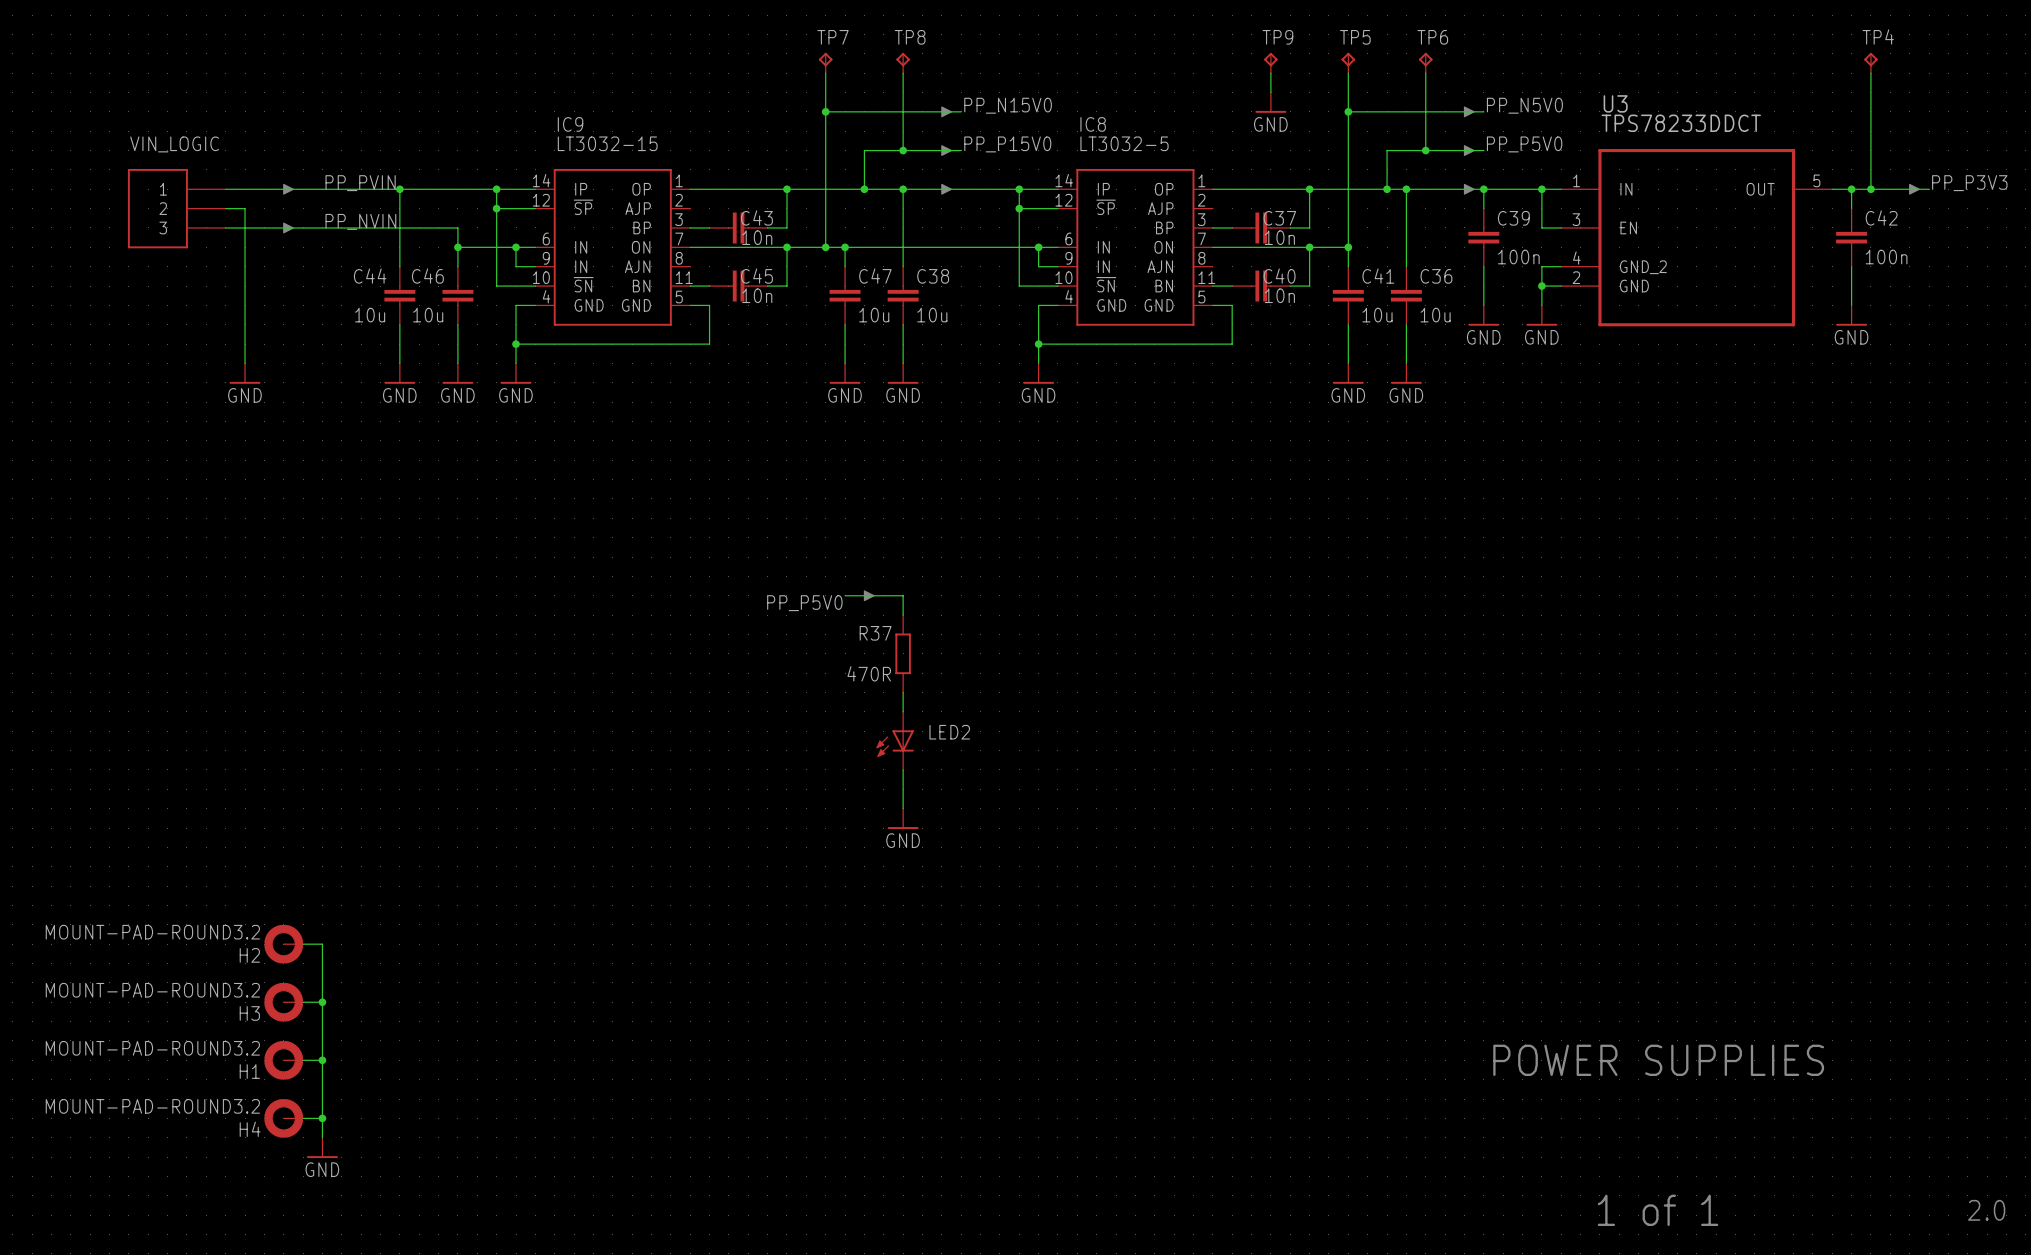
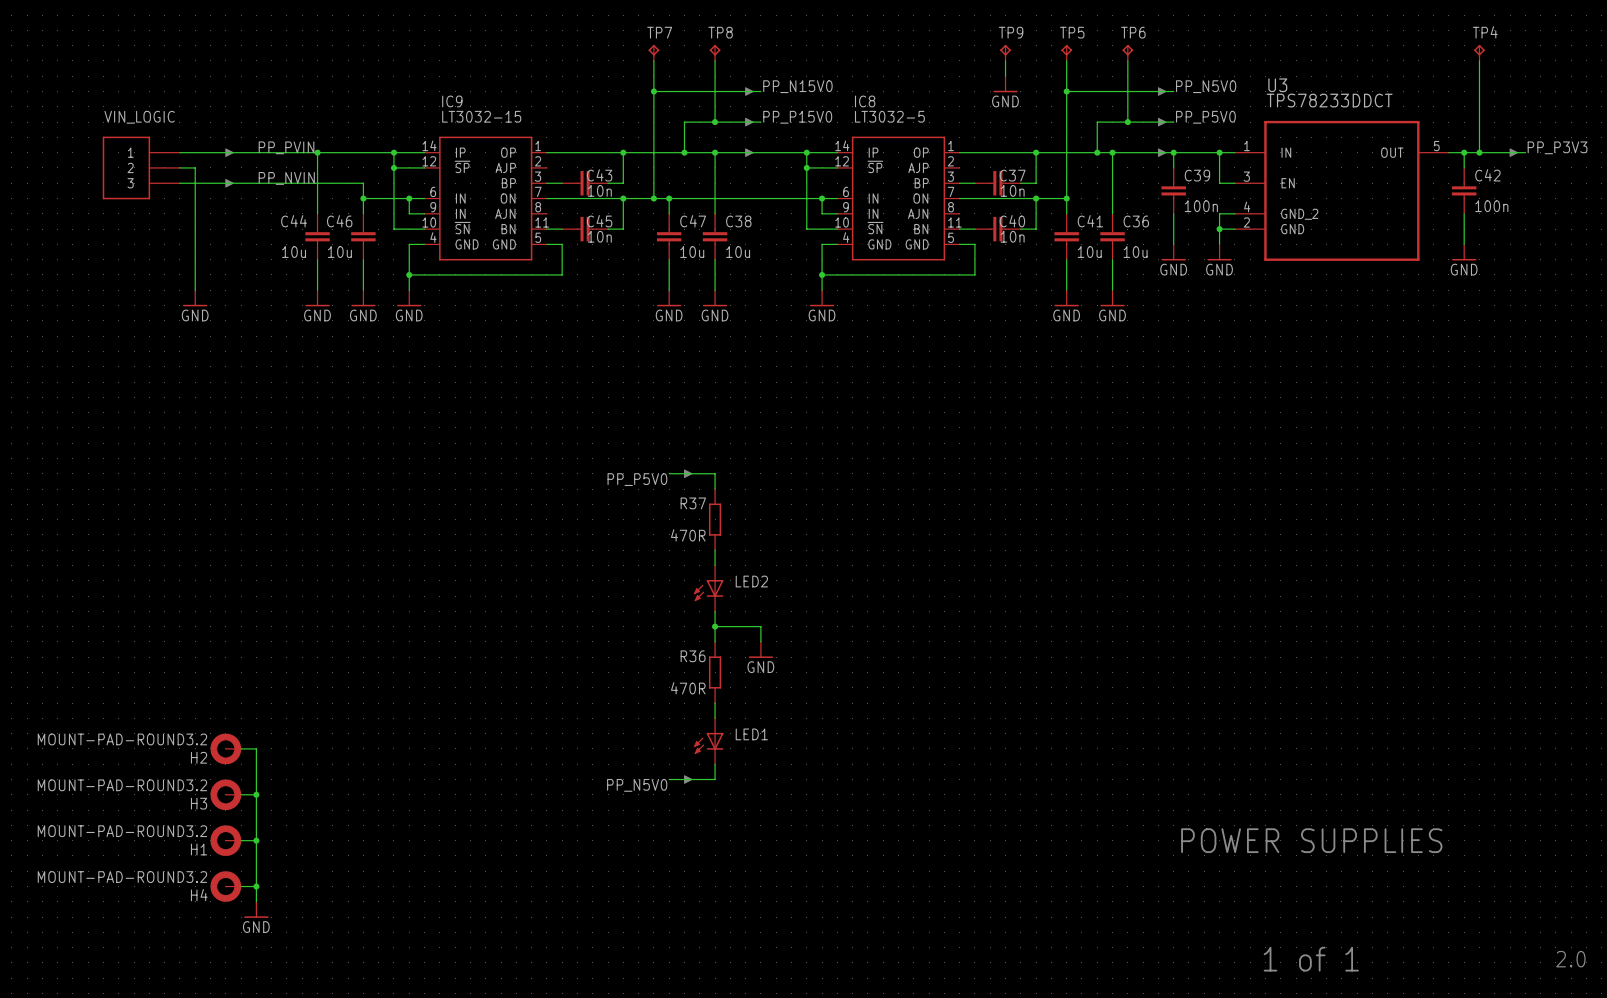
wire: none -> (715, 626) (760, 626) (760, 641)
junction: none -> (715, 626)
power symbol position: GND (903, 818) -> GND (760, 649)
R36: none -> 470R (715, 672)
wire: none -> (715, 703) (715, 718)
LED1: none -> (708, 741)
wire: none -> (715, 764) (715, 779) (669, 779)
part: none -> (688, 779)
label: none -> PP_N5V0 (637, 785)

